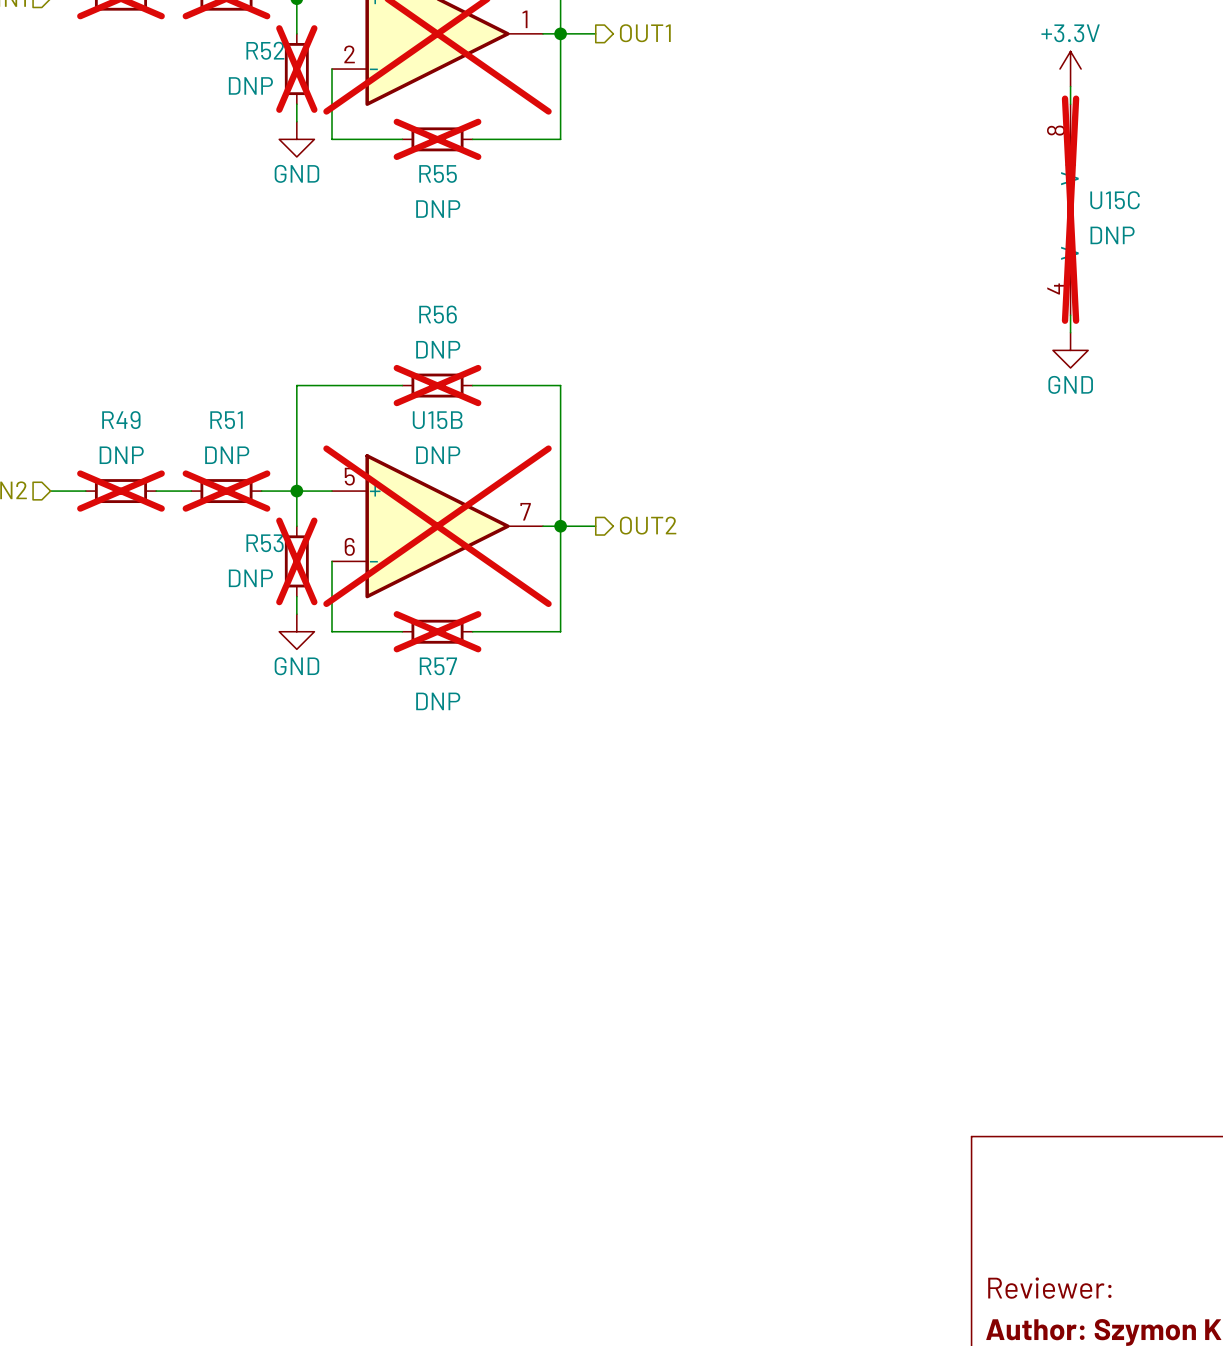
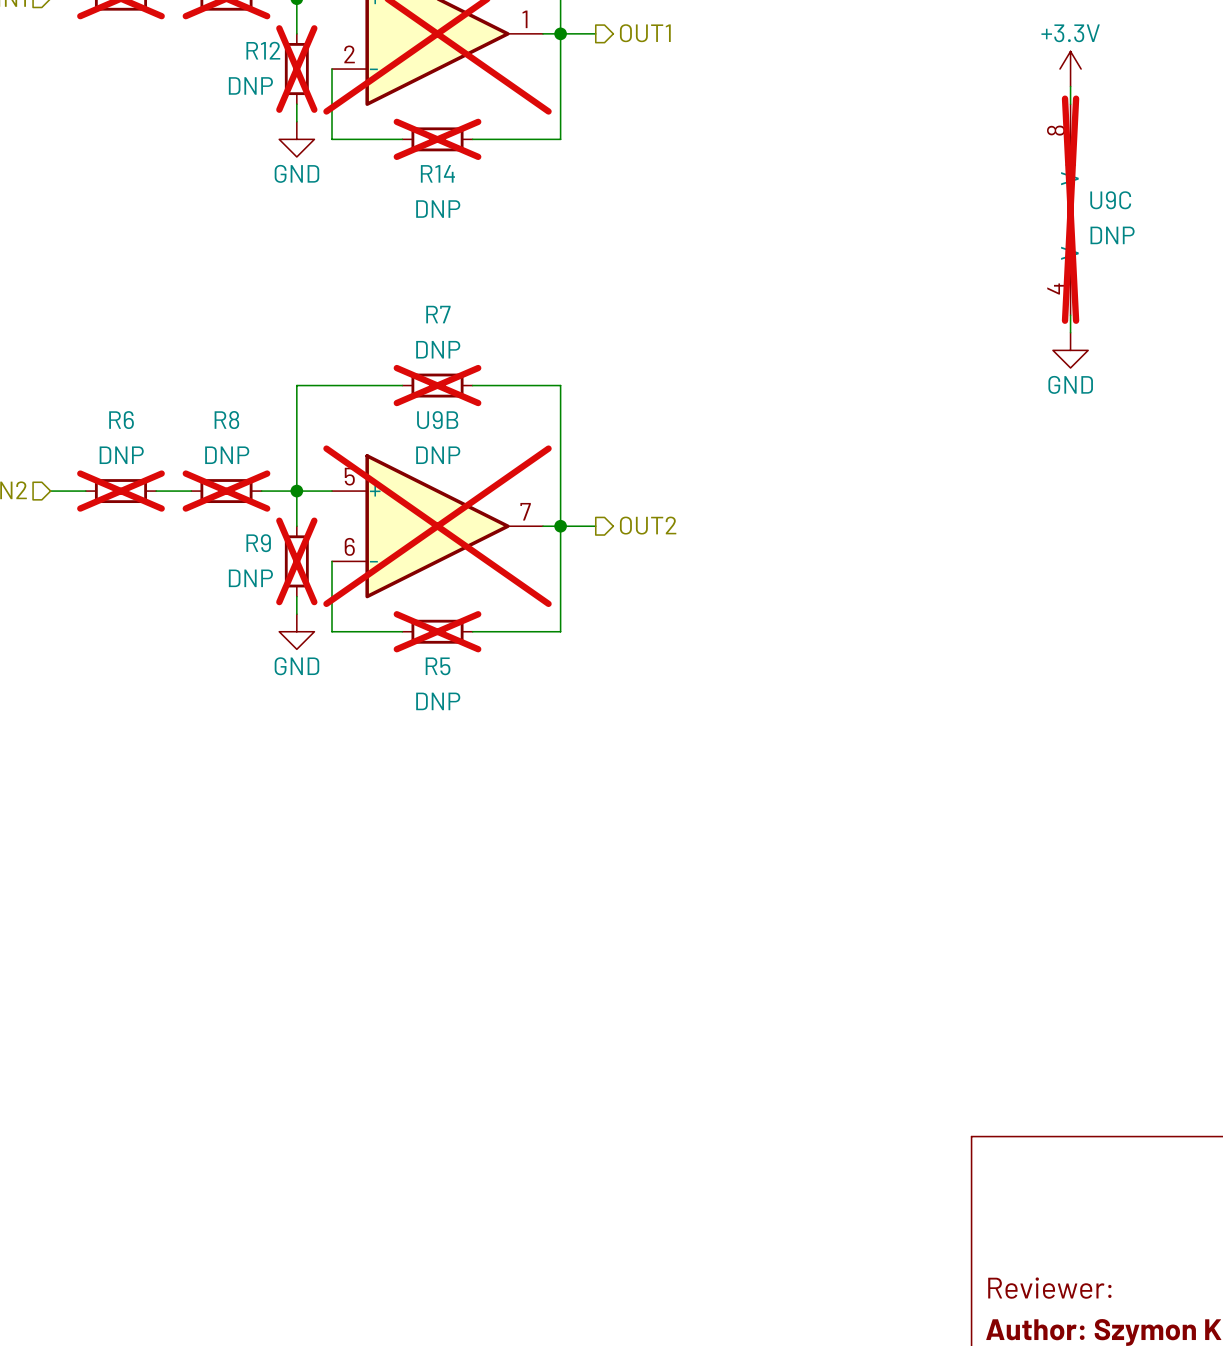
R52 name: R52 (265, 50) -> R12 (263, 50)
R55 name: R55 (438, 173) -> R14 (437, 173)
U15C name: U15C (1115, 200) -> U9C (1110, 200)
R56 name: R56 (438, 314) -> R7 (438, 314)
R49 name: R49 (121, 420) -> R6 (121, 420)
R51 name: R51 (226, 420) -> R8 (226, 420)
U15B name: U15B (437, 420) -> U9B (437, 420)
R53 name: R53 (265, 543) -> R9 (258, 543)
R57 name: R57 (438, 666) -> R5 (438, 666)

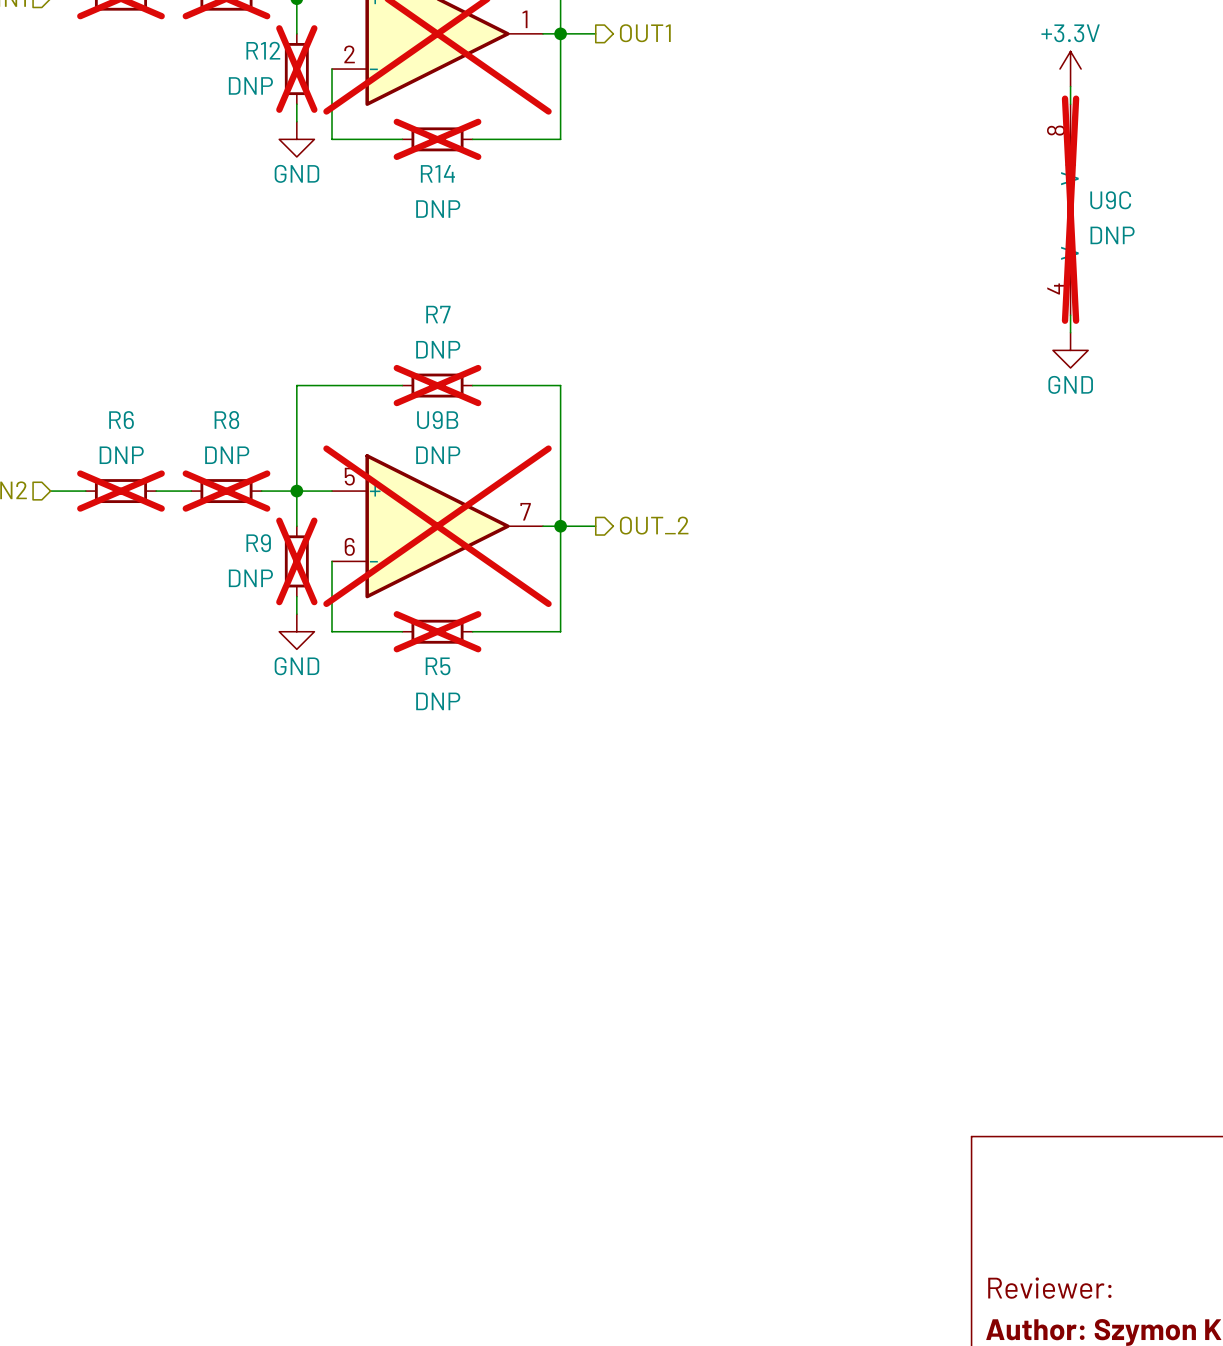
hierarchical label: OUT2 (648, 525) -> OUT_2 (654, 525)

